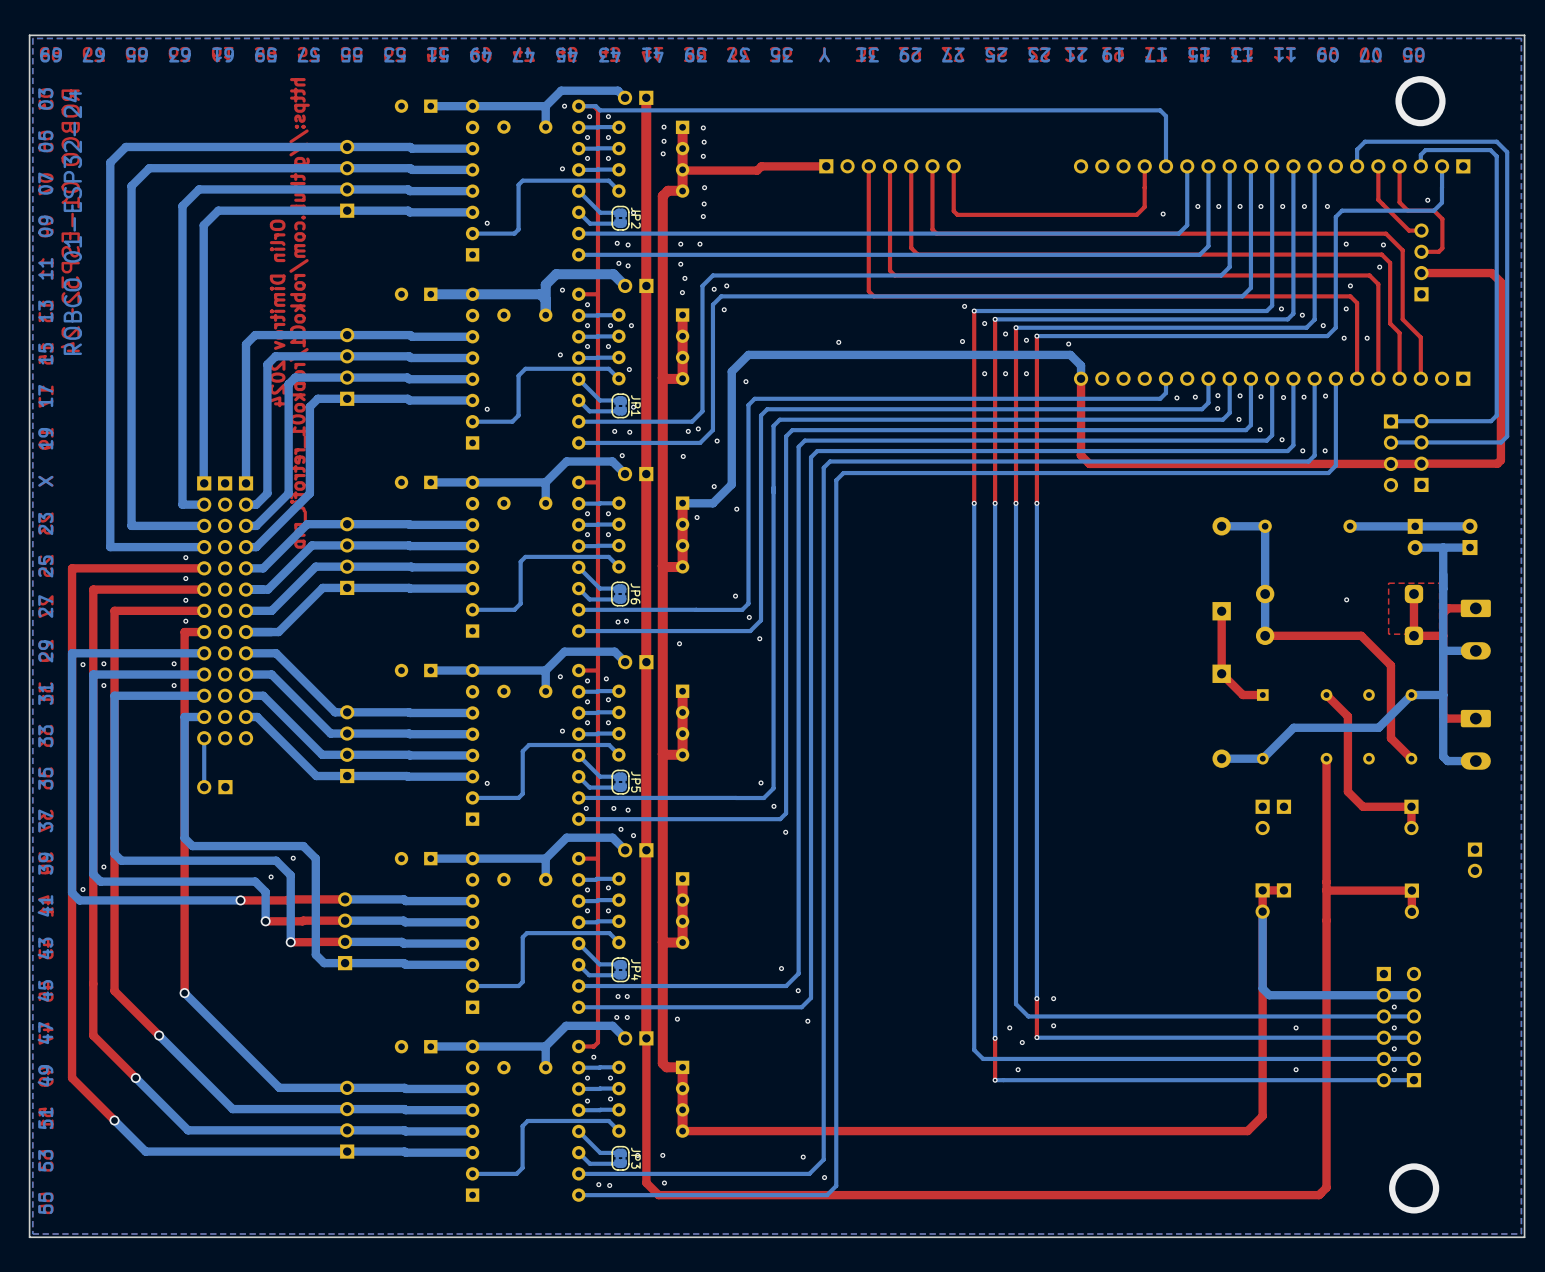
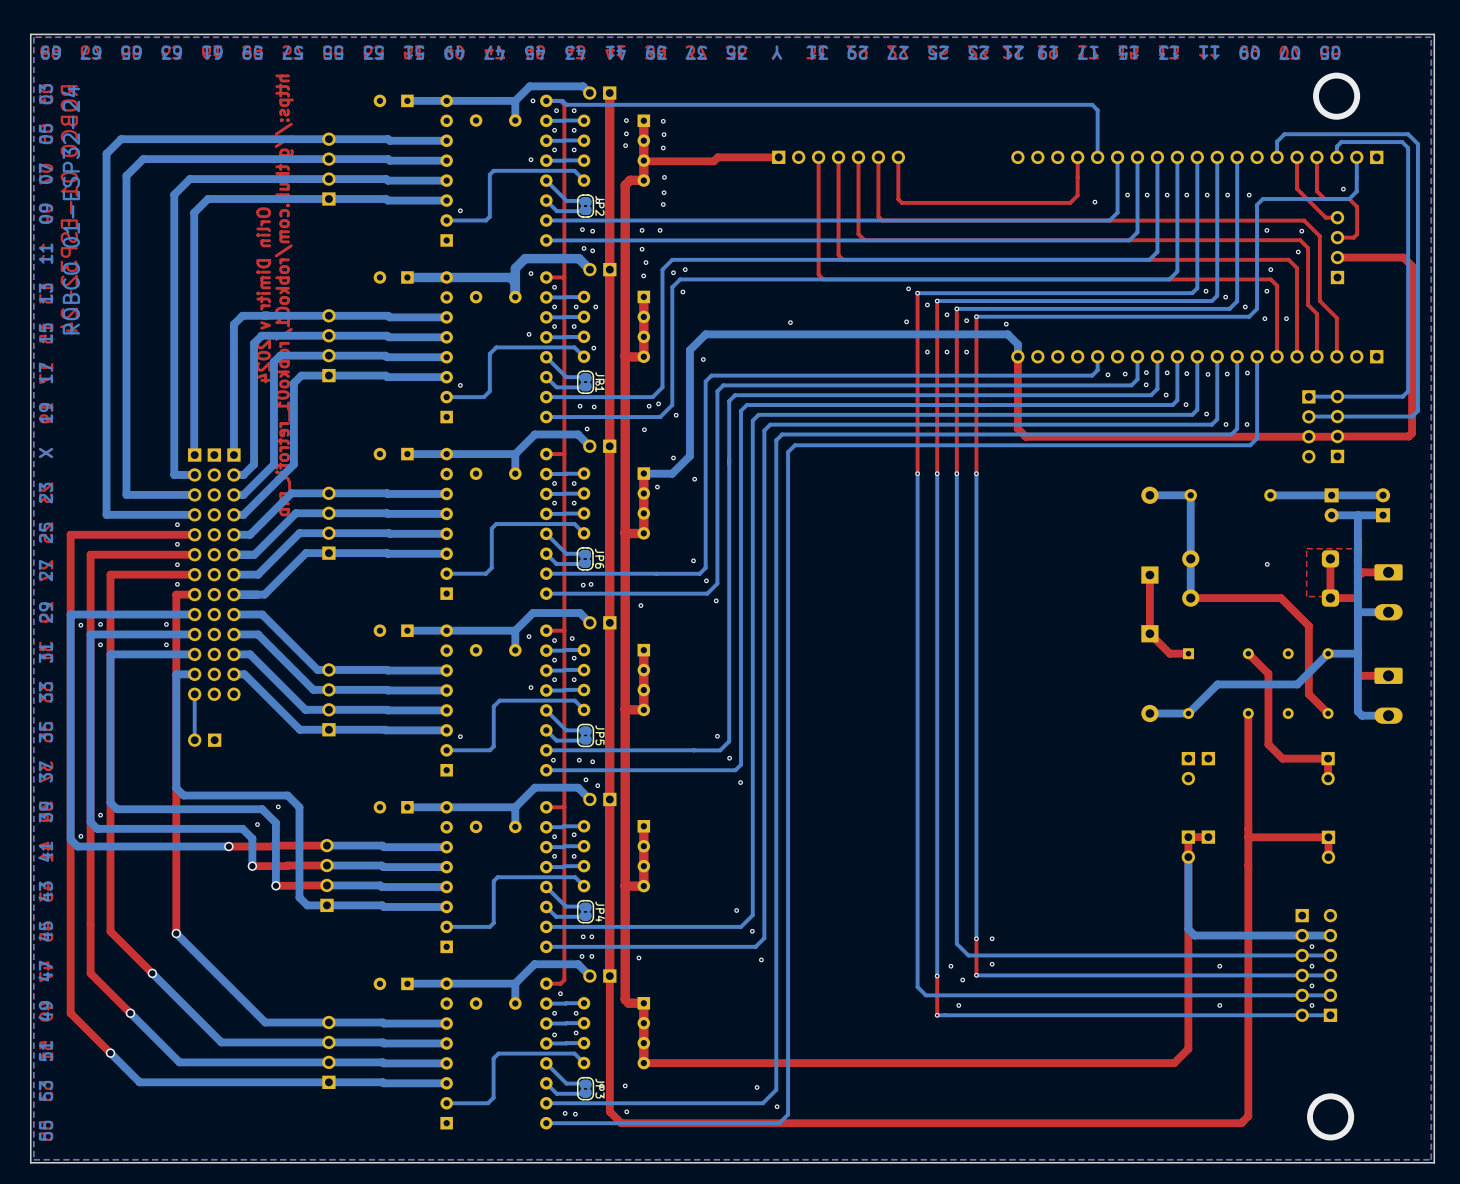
part: (1474, 860) -> none

